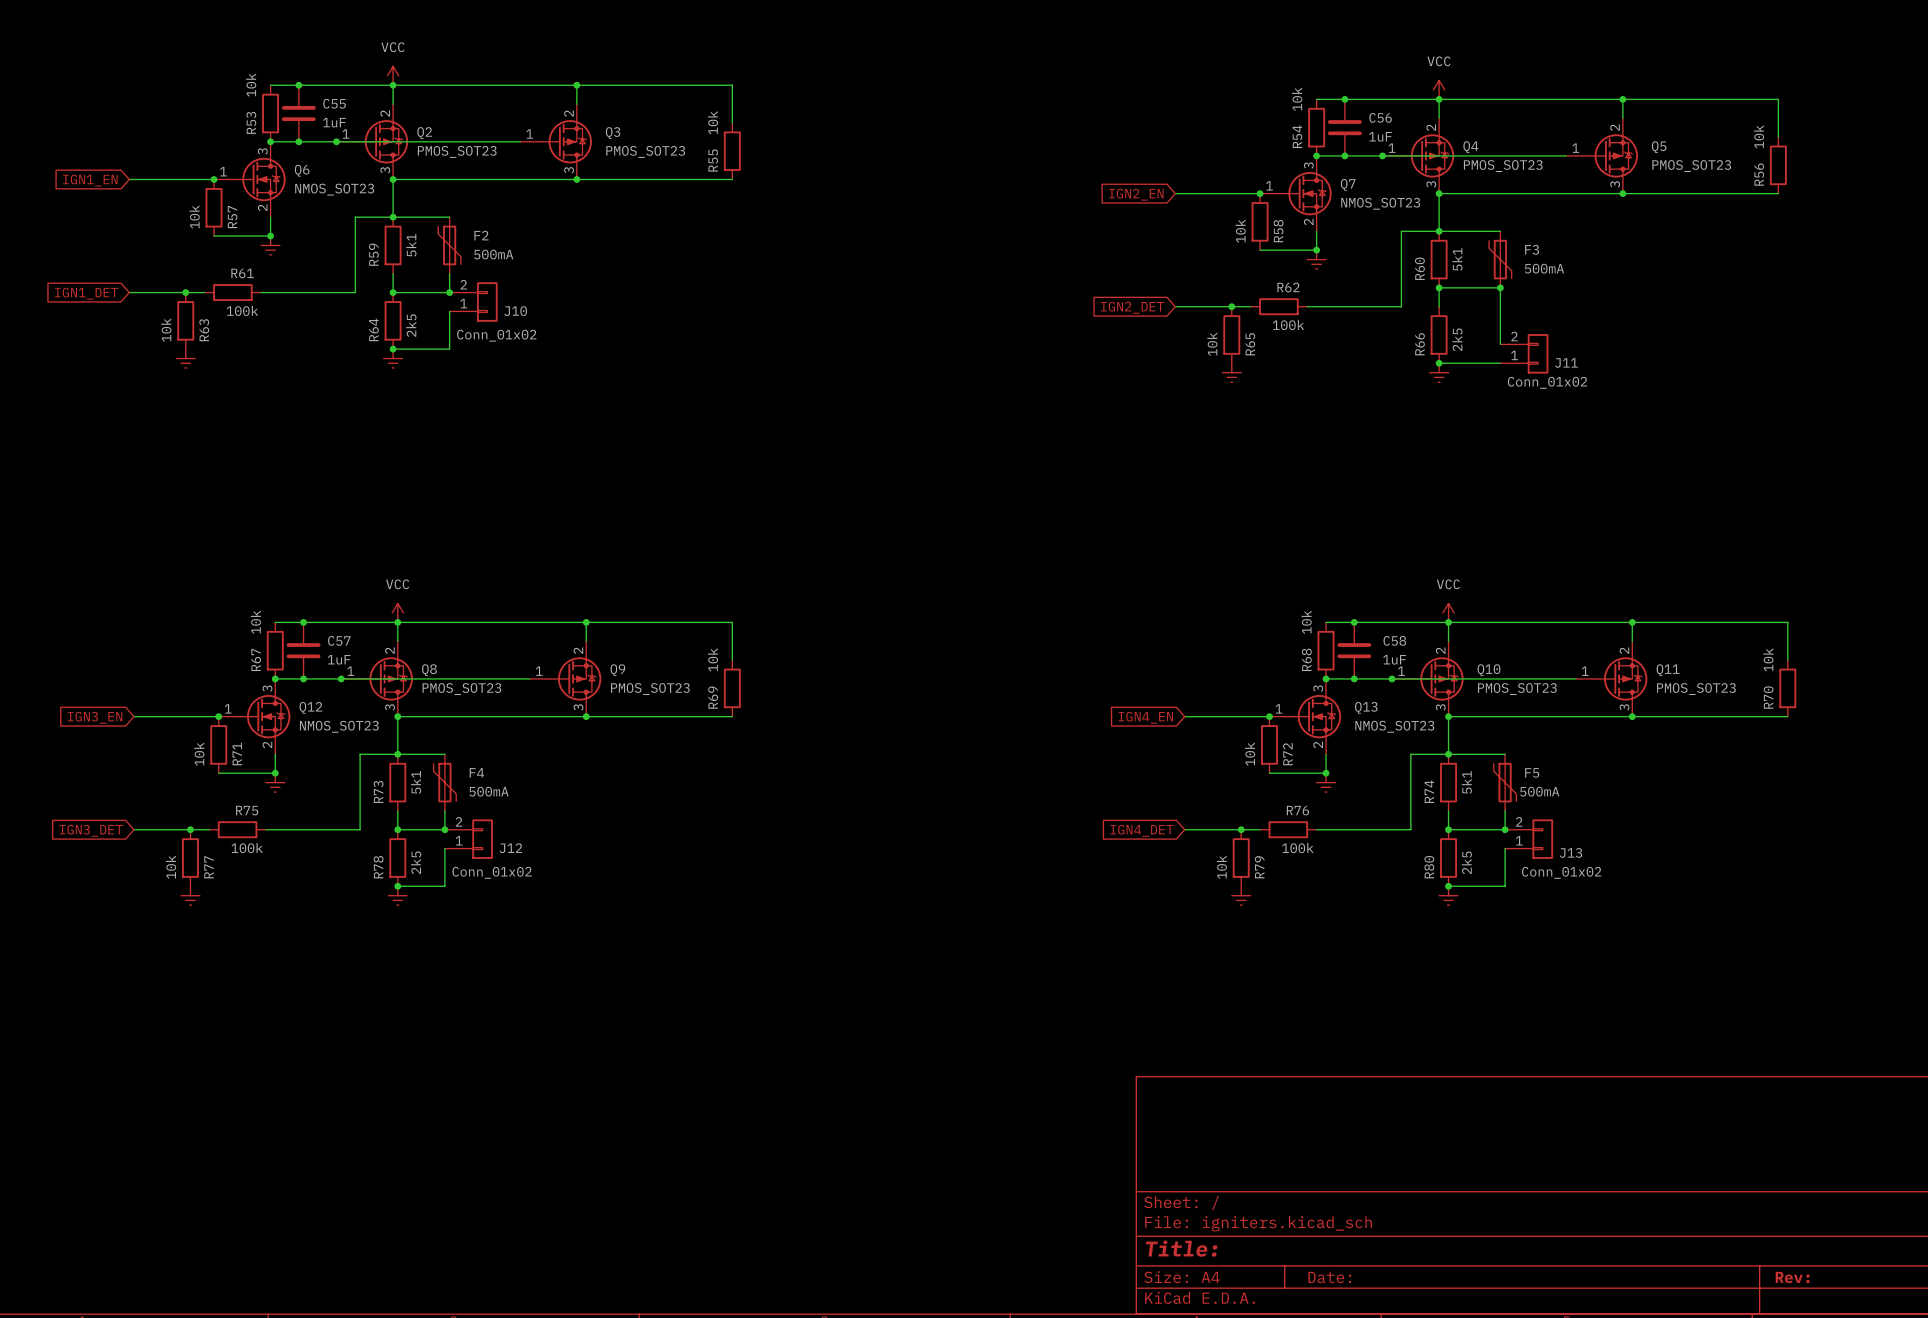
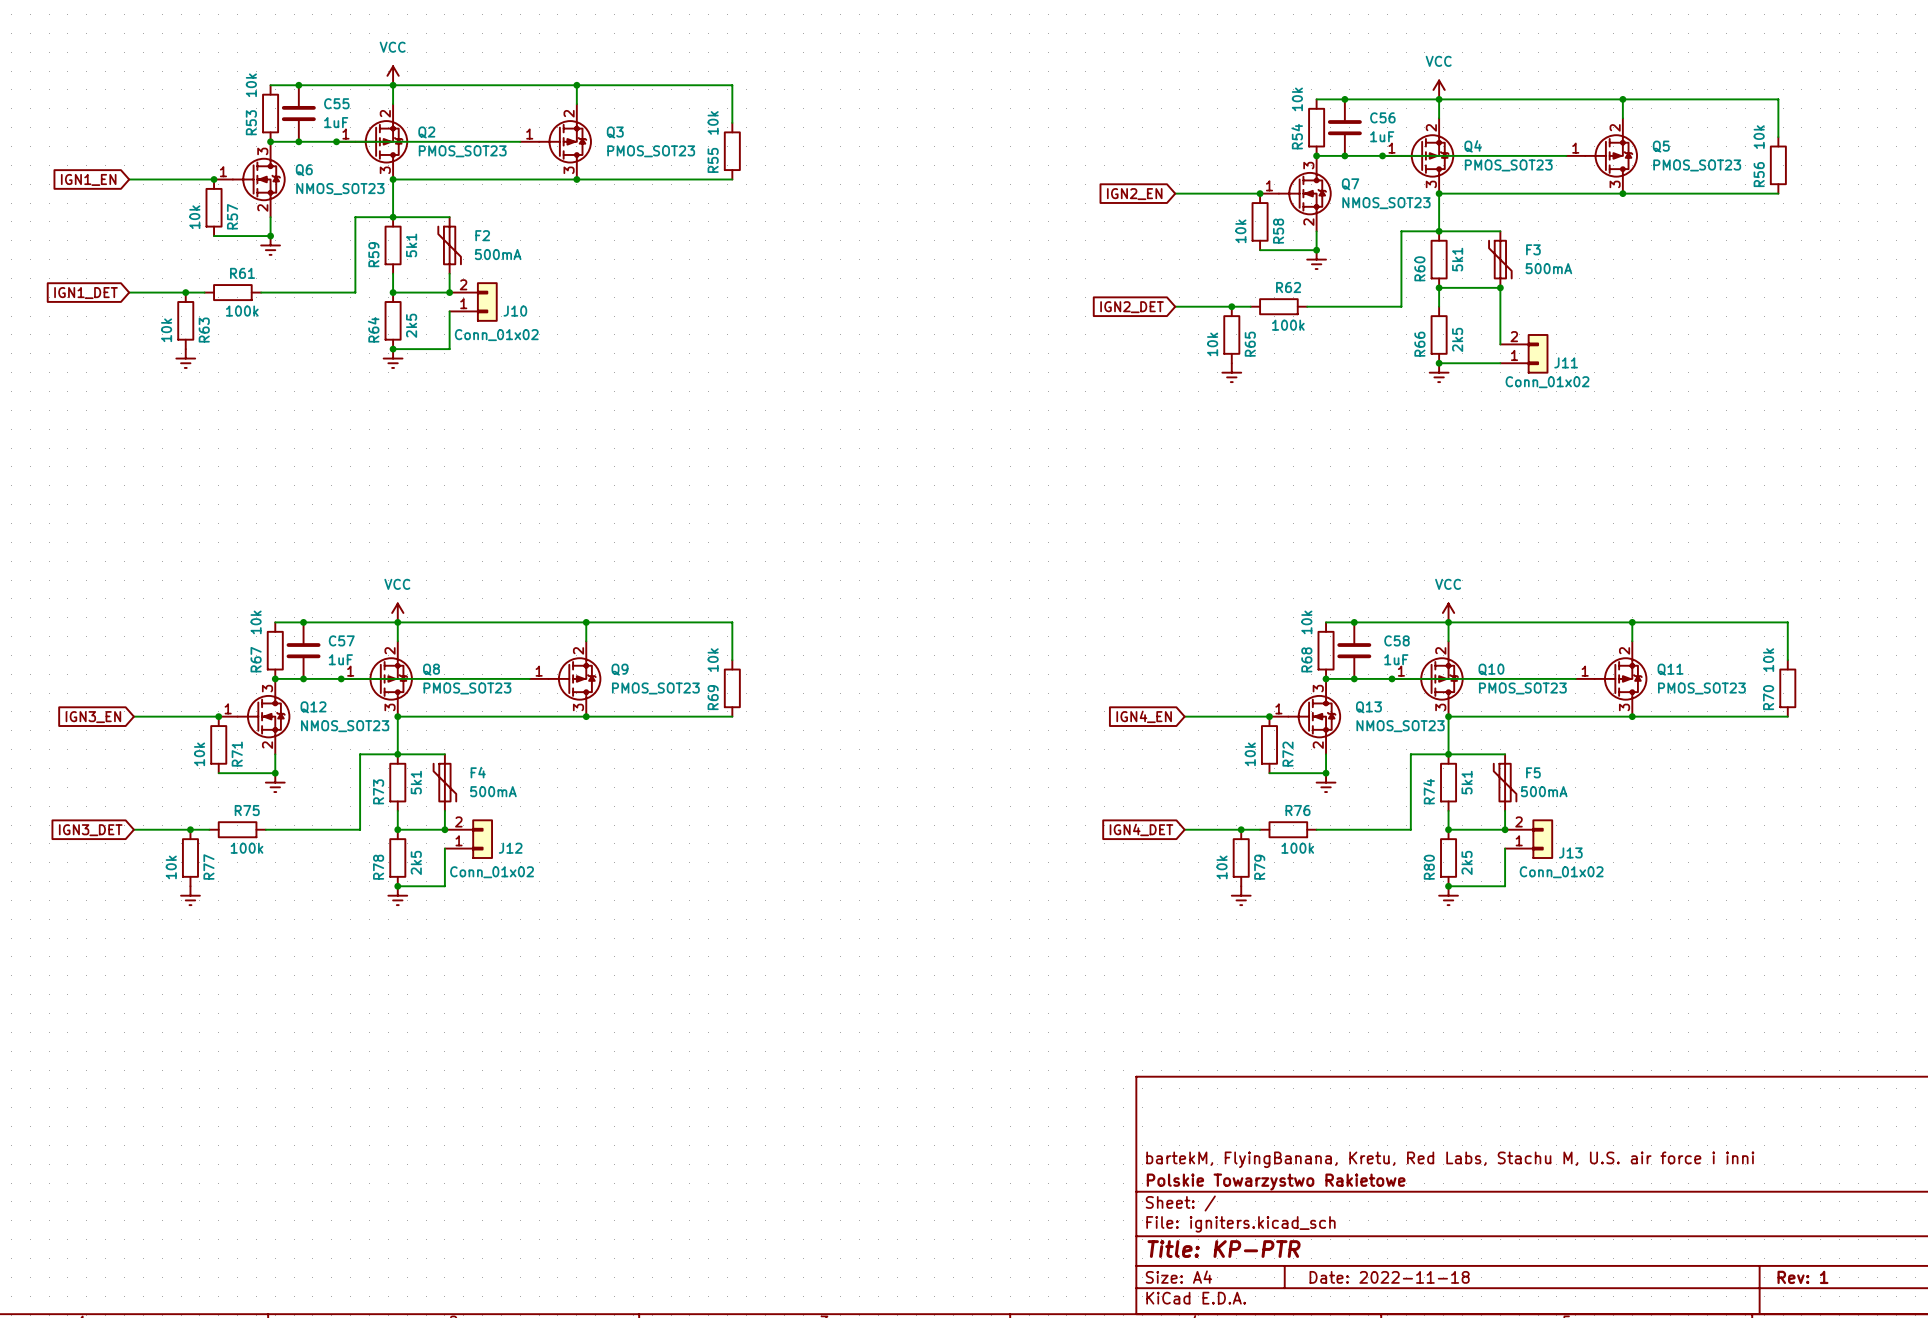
title block: none -> bartekM, FlyingBanana, Kretu, Red Labs, Stachu M, U.S. air force i inni (1450, 1159)
title block: none -> Polskie Towarzystwo Rakietowe (1276, 1182)
title block: Title: (1181, 1248) -> Title: KP-PTR (1224, 1249)
title block: Date: (1329, 1277) -> Date: 2022-11-18 (1389, 1277)
title block: Rev: (1792, 1277) -> Rev: 1 (1802, 1277)

